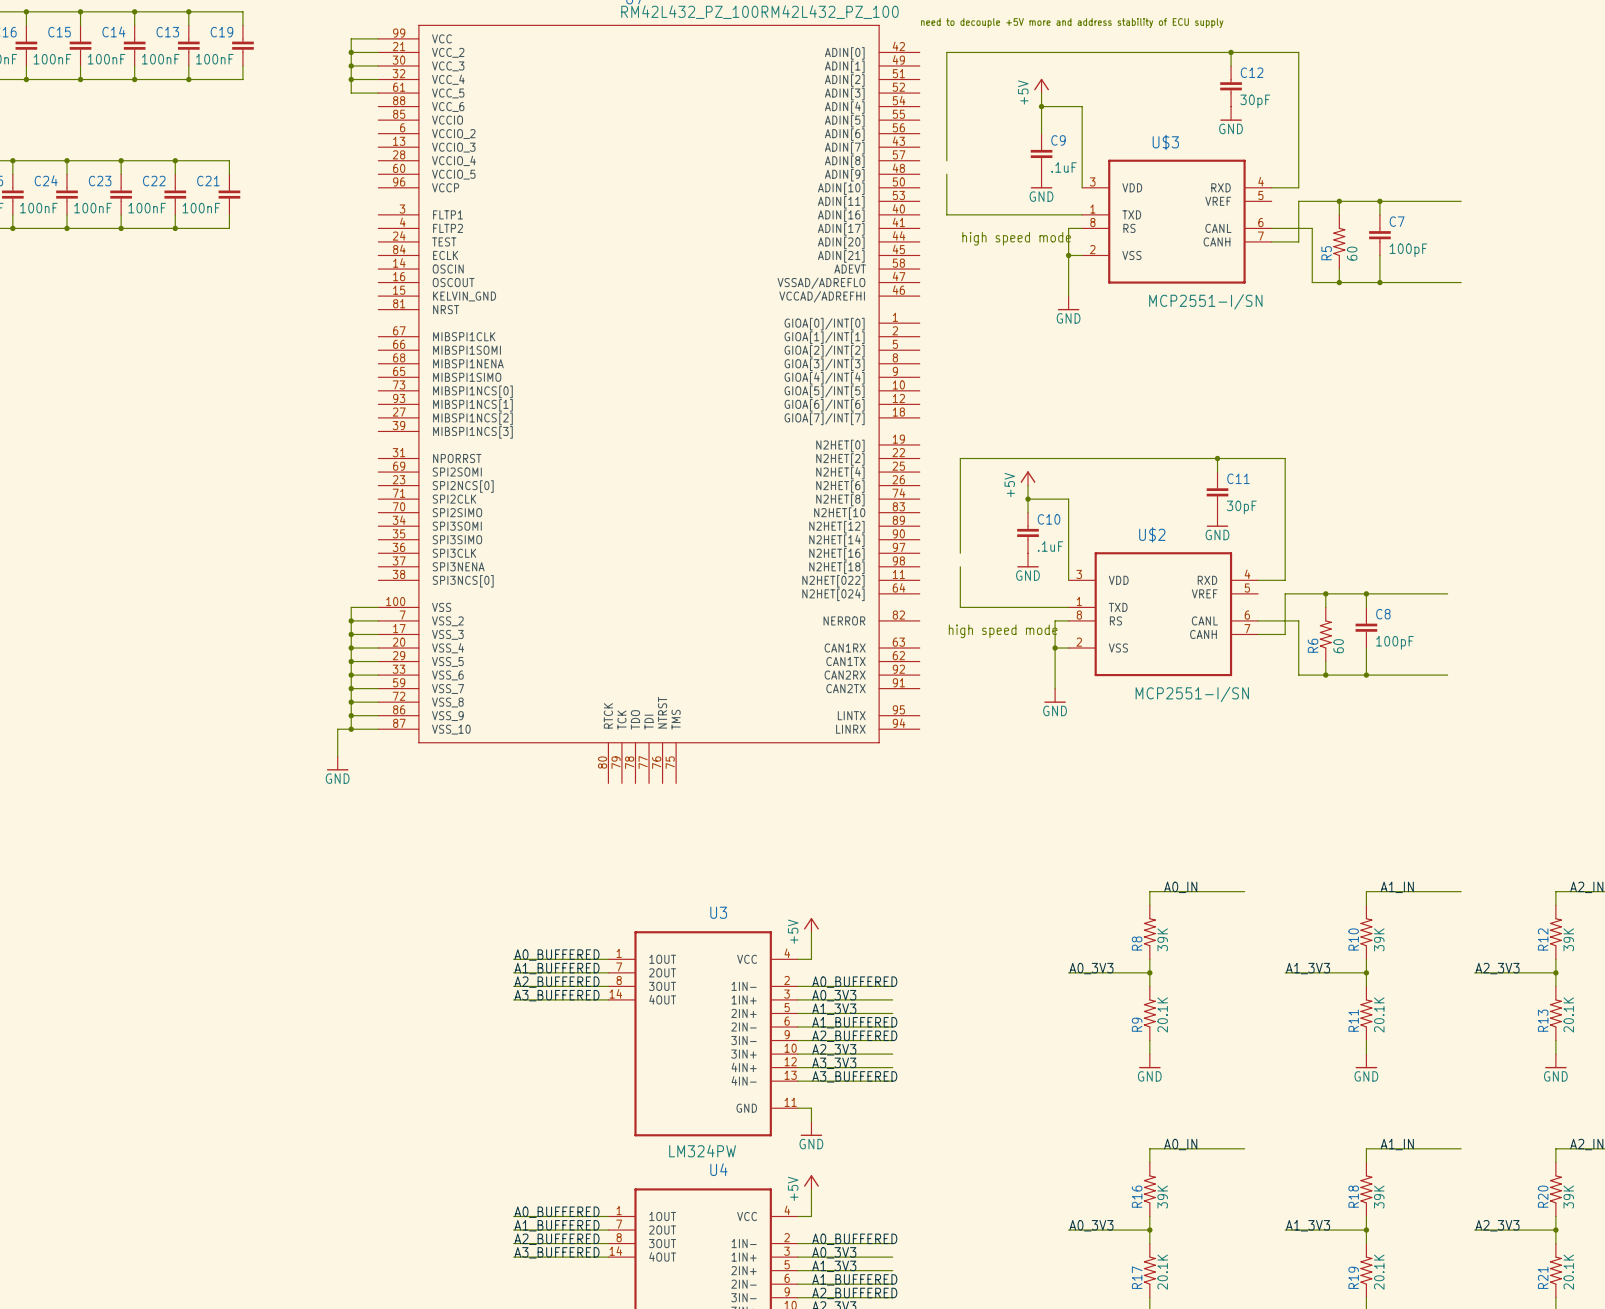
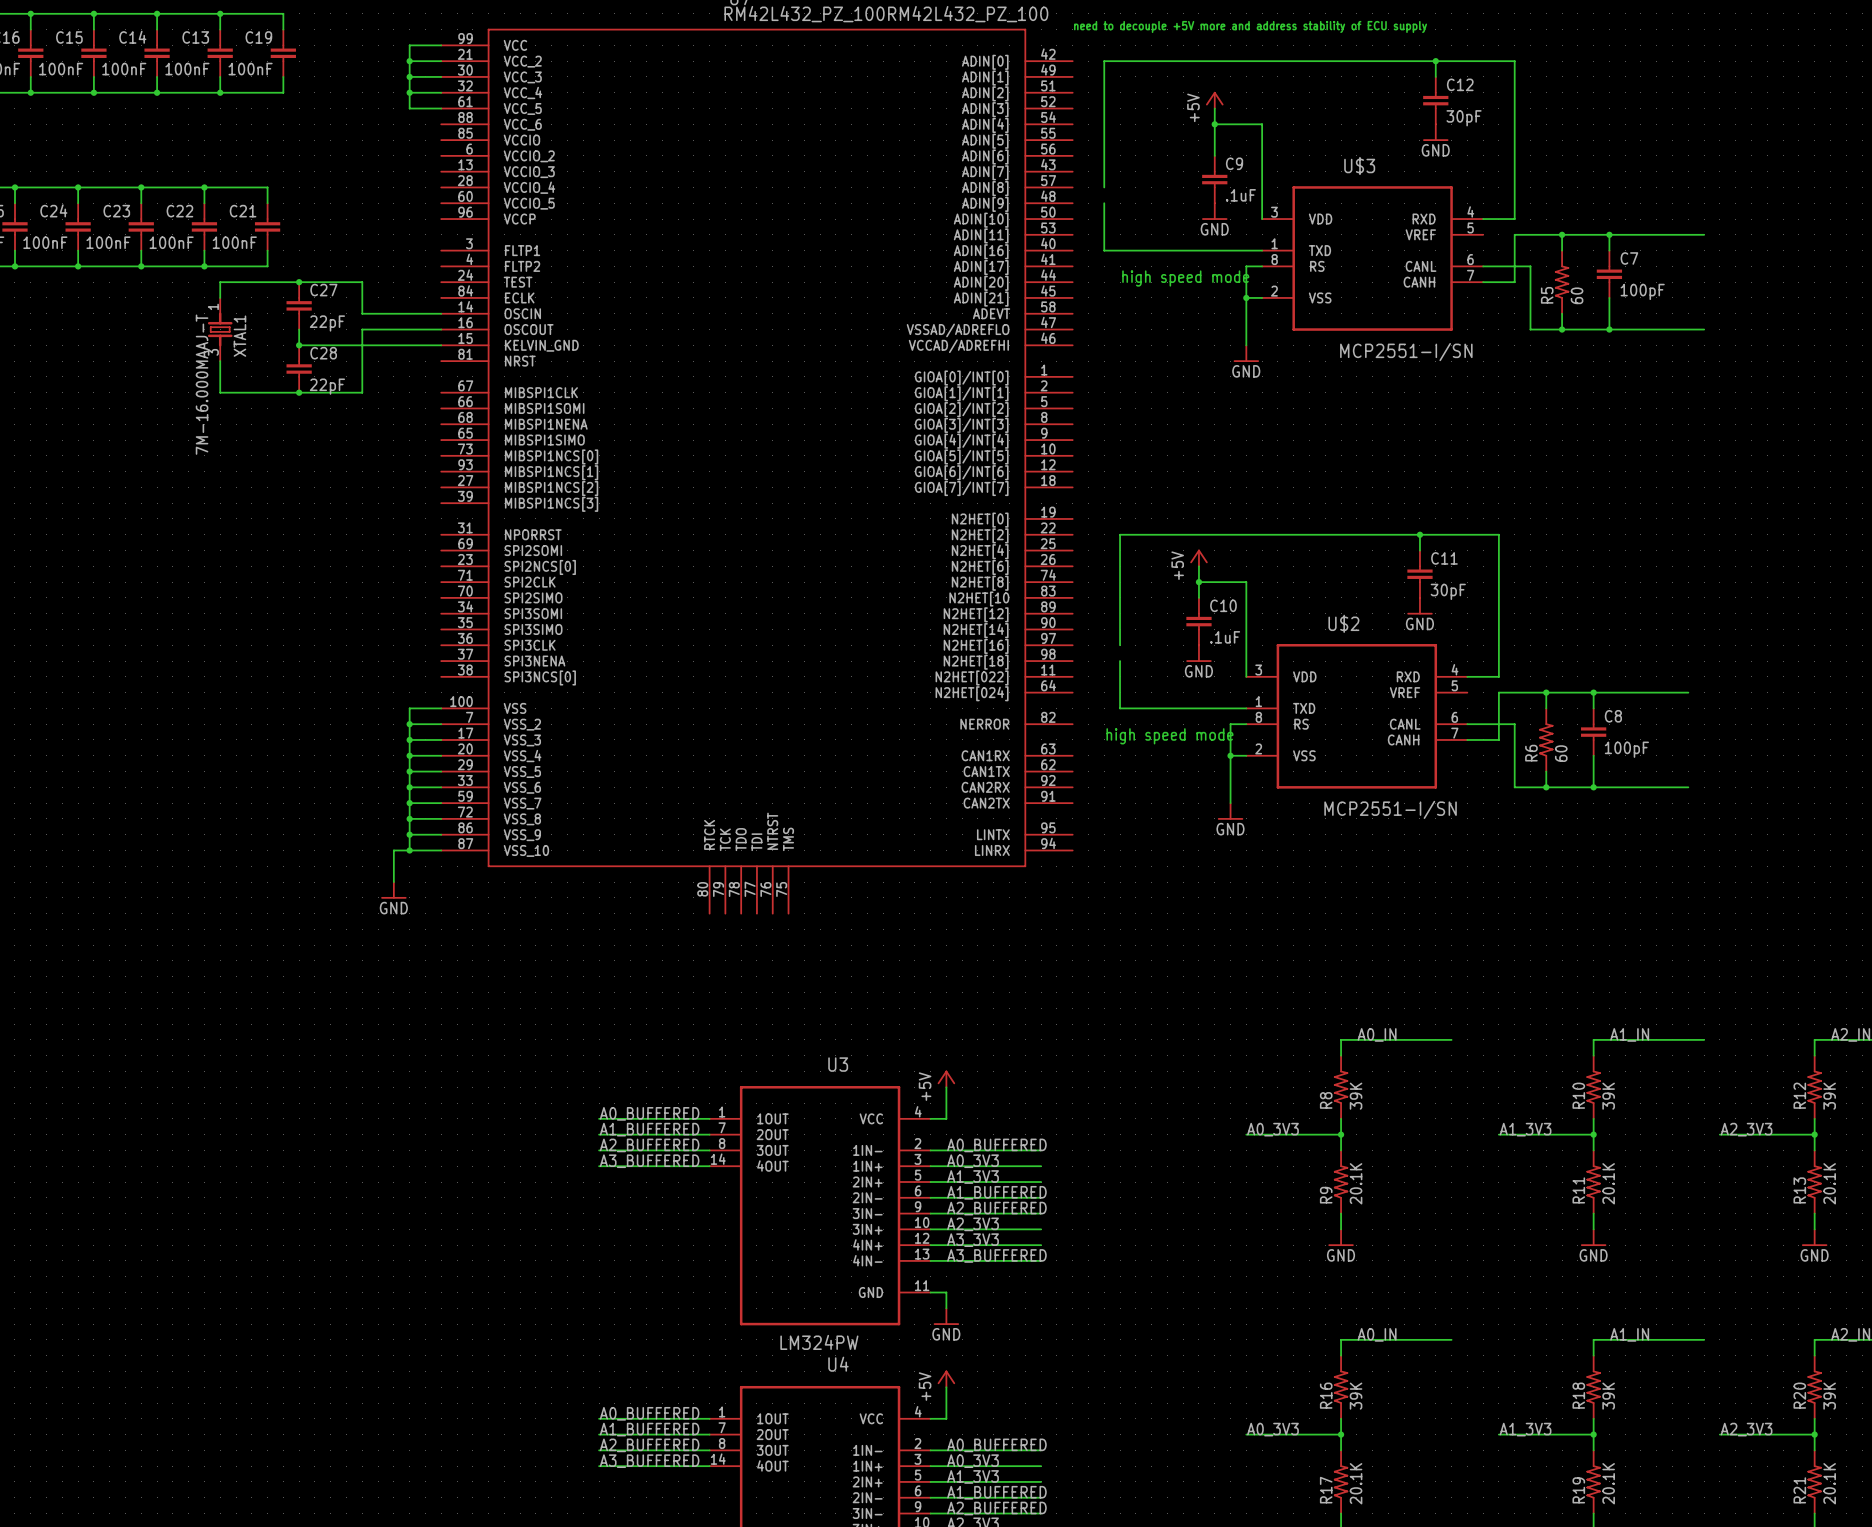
junction: none -> (299, 282)
wire: none -> (220, 297) (220, 282) (362, 282) (362, 313) (441, 313)
C27: none -> 22pF (299, 305)
XTAL1: none -> 7M-16.000MAAJ-T (220, 329)
wire: none -> (299, 329) (299, 345) (441, 345)
wire: none -> (441, 329) (362, 329) (362, 392) (220, 392) (220, 361)
junction: none -> (299, 345)
C28: none -> 22pF (299, 369)
junction: none -> (299, 392)

